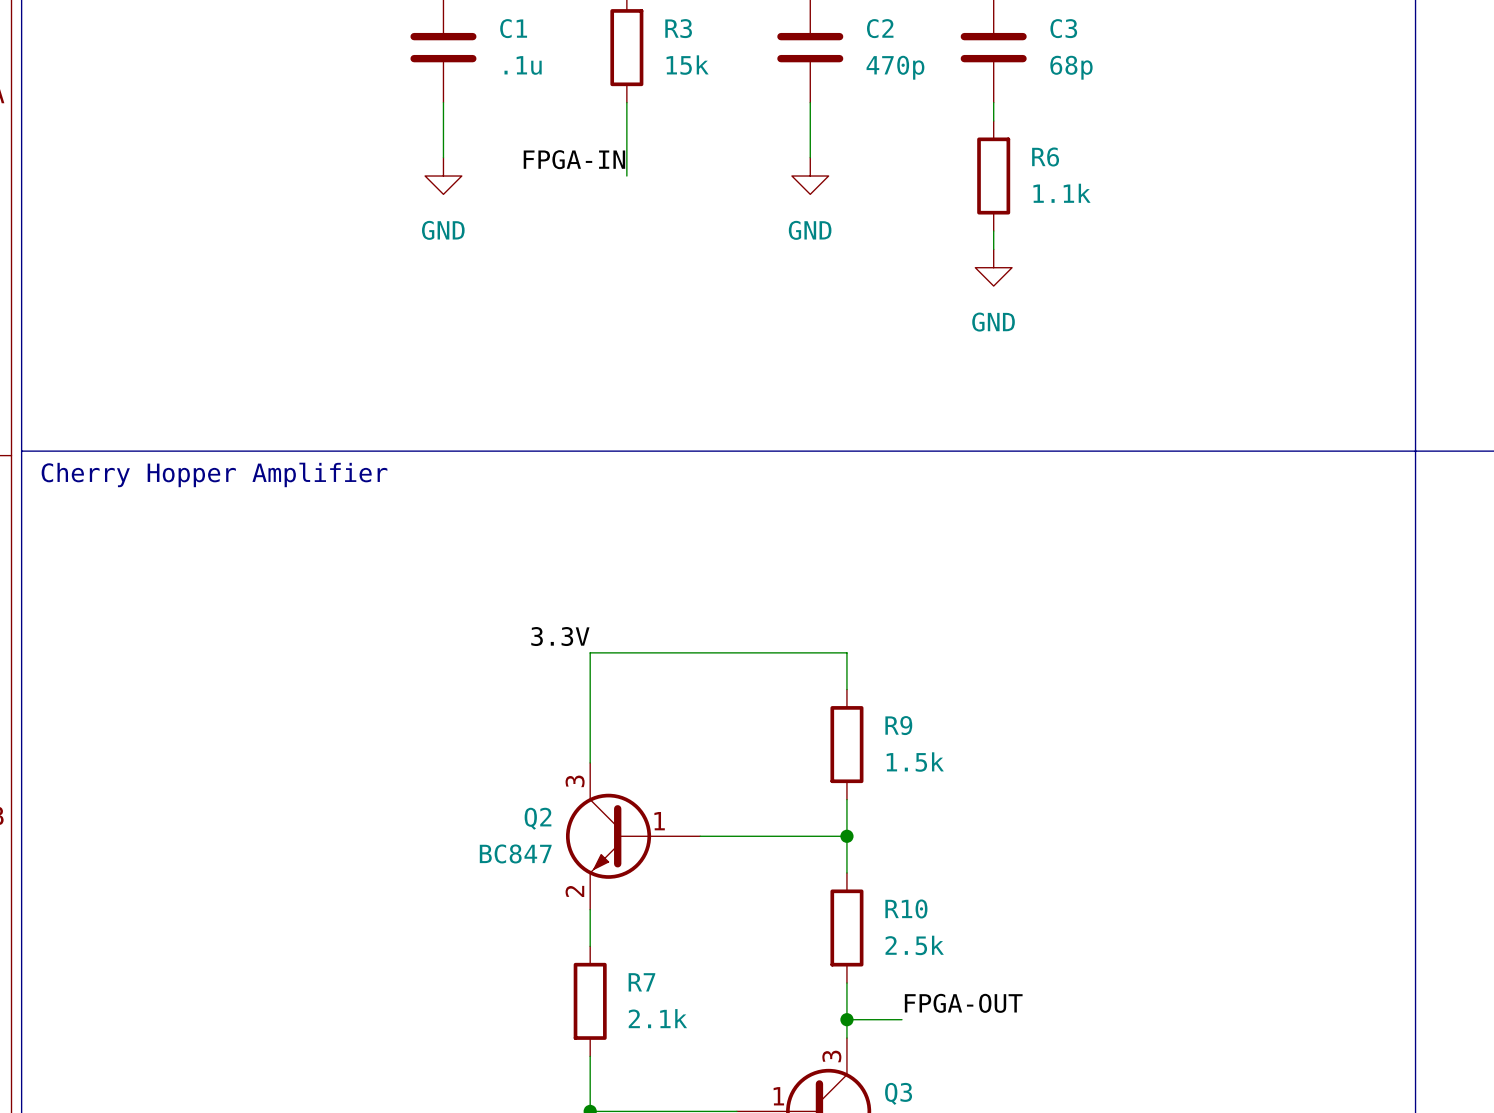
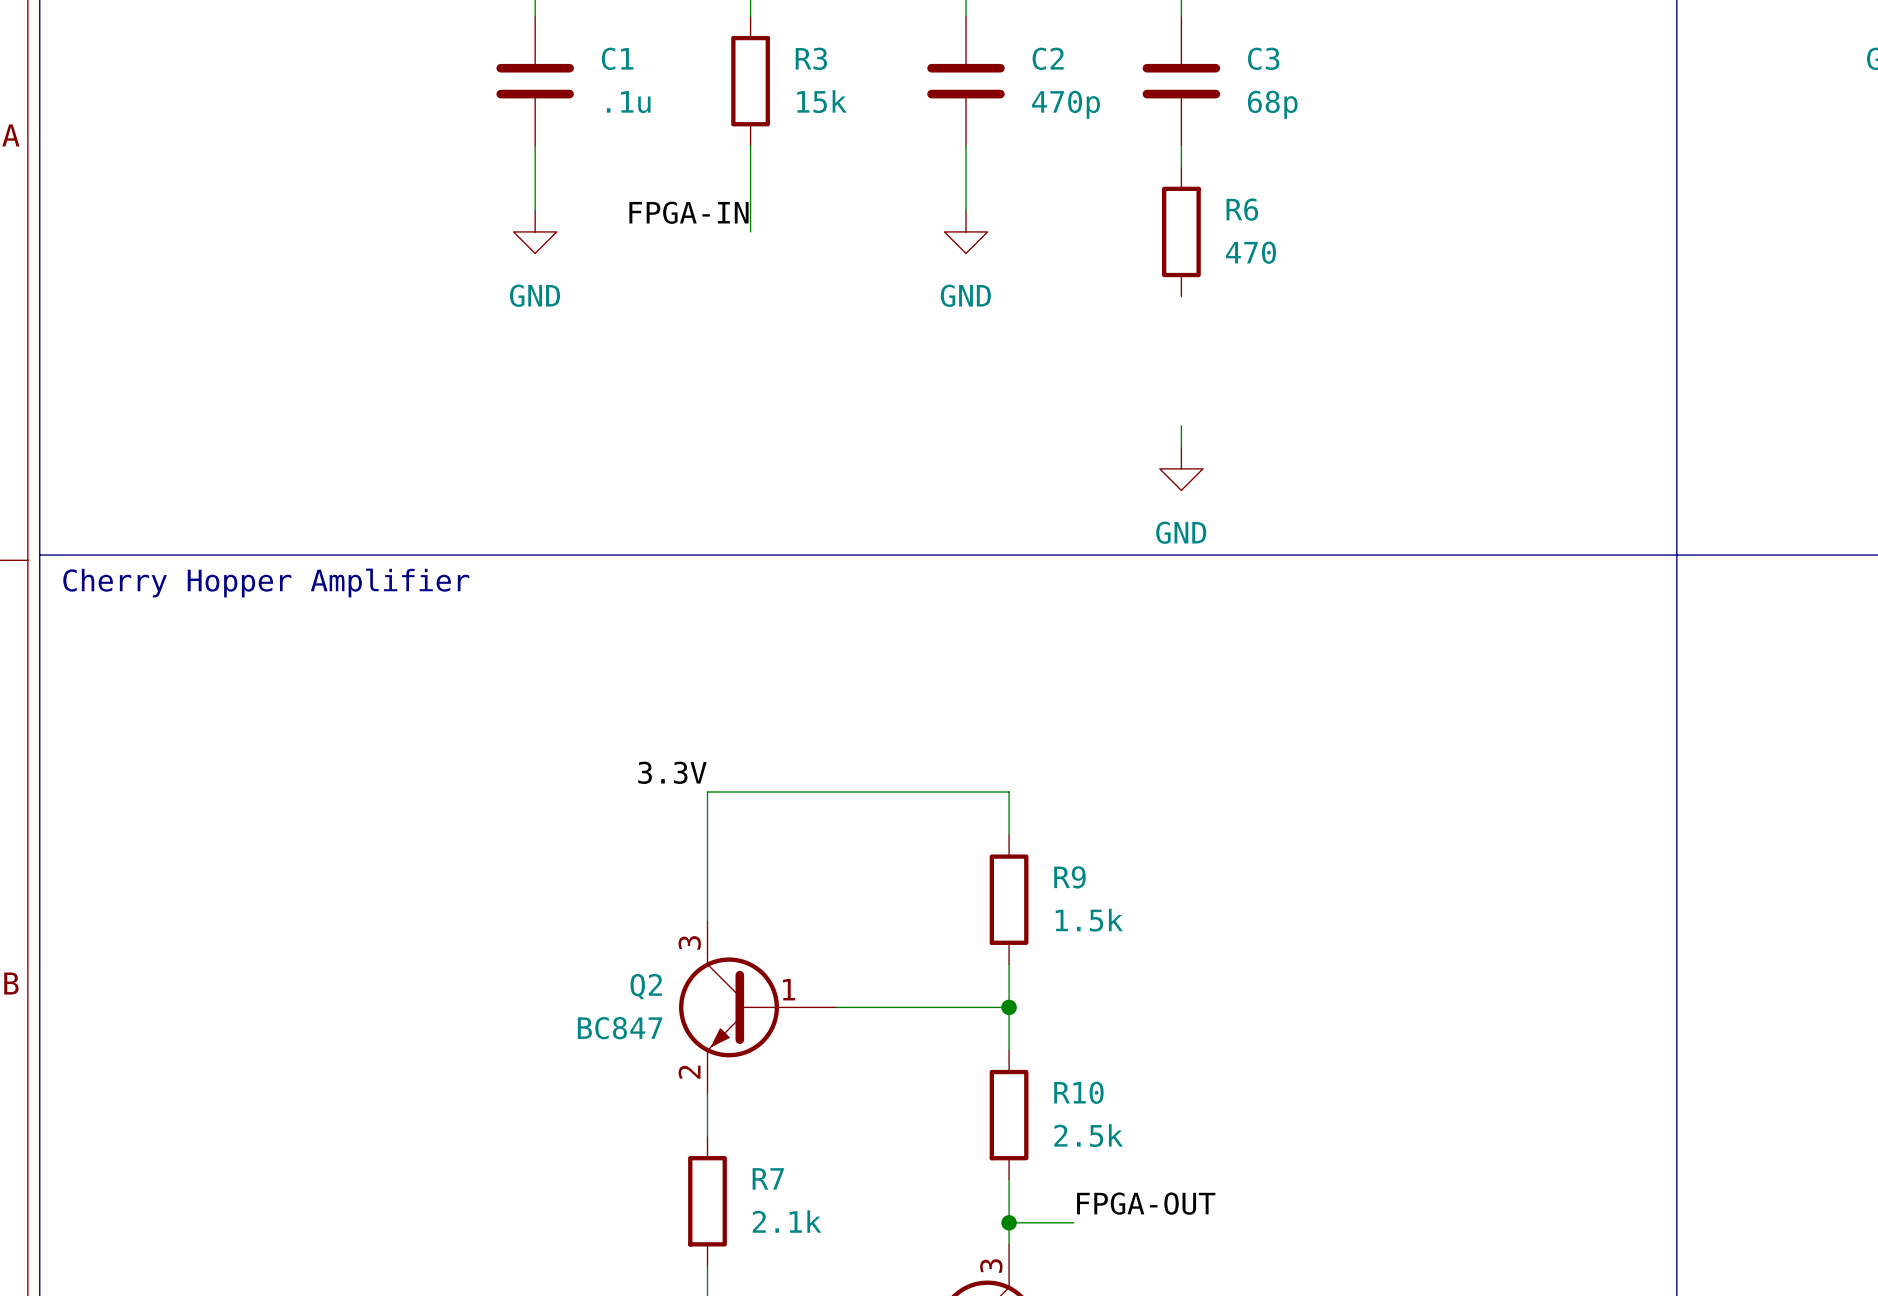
R6 value: 1.1k (1061, 193) -> 470 (1250, 252)
wire: (993, 231) (993, 249) -> (1181, 425) (1181, 447)
power symbol position: GND (993, 267) -> GND (1181, 468)

